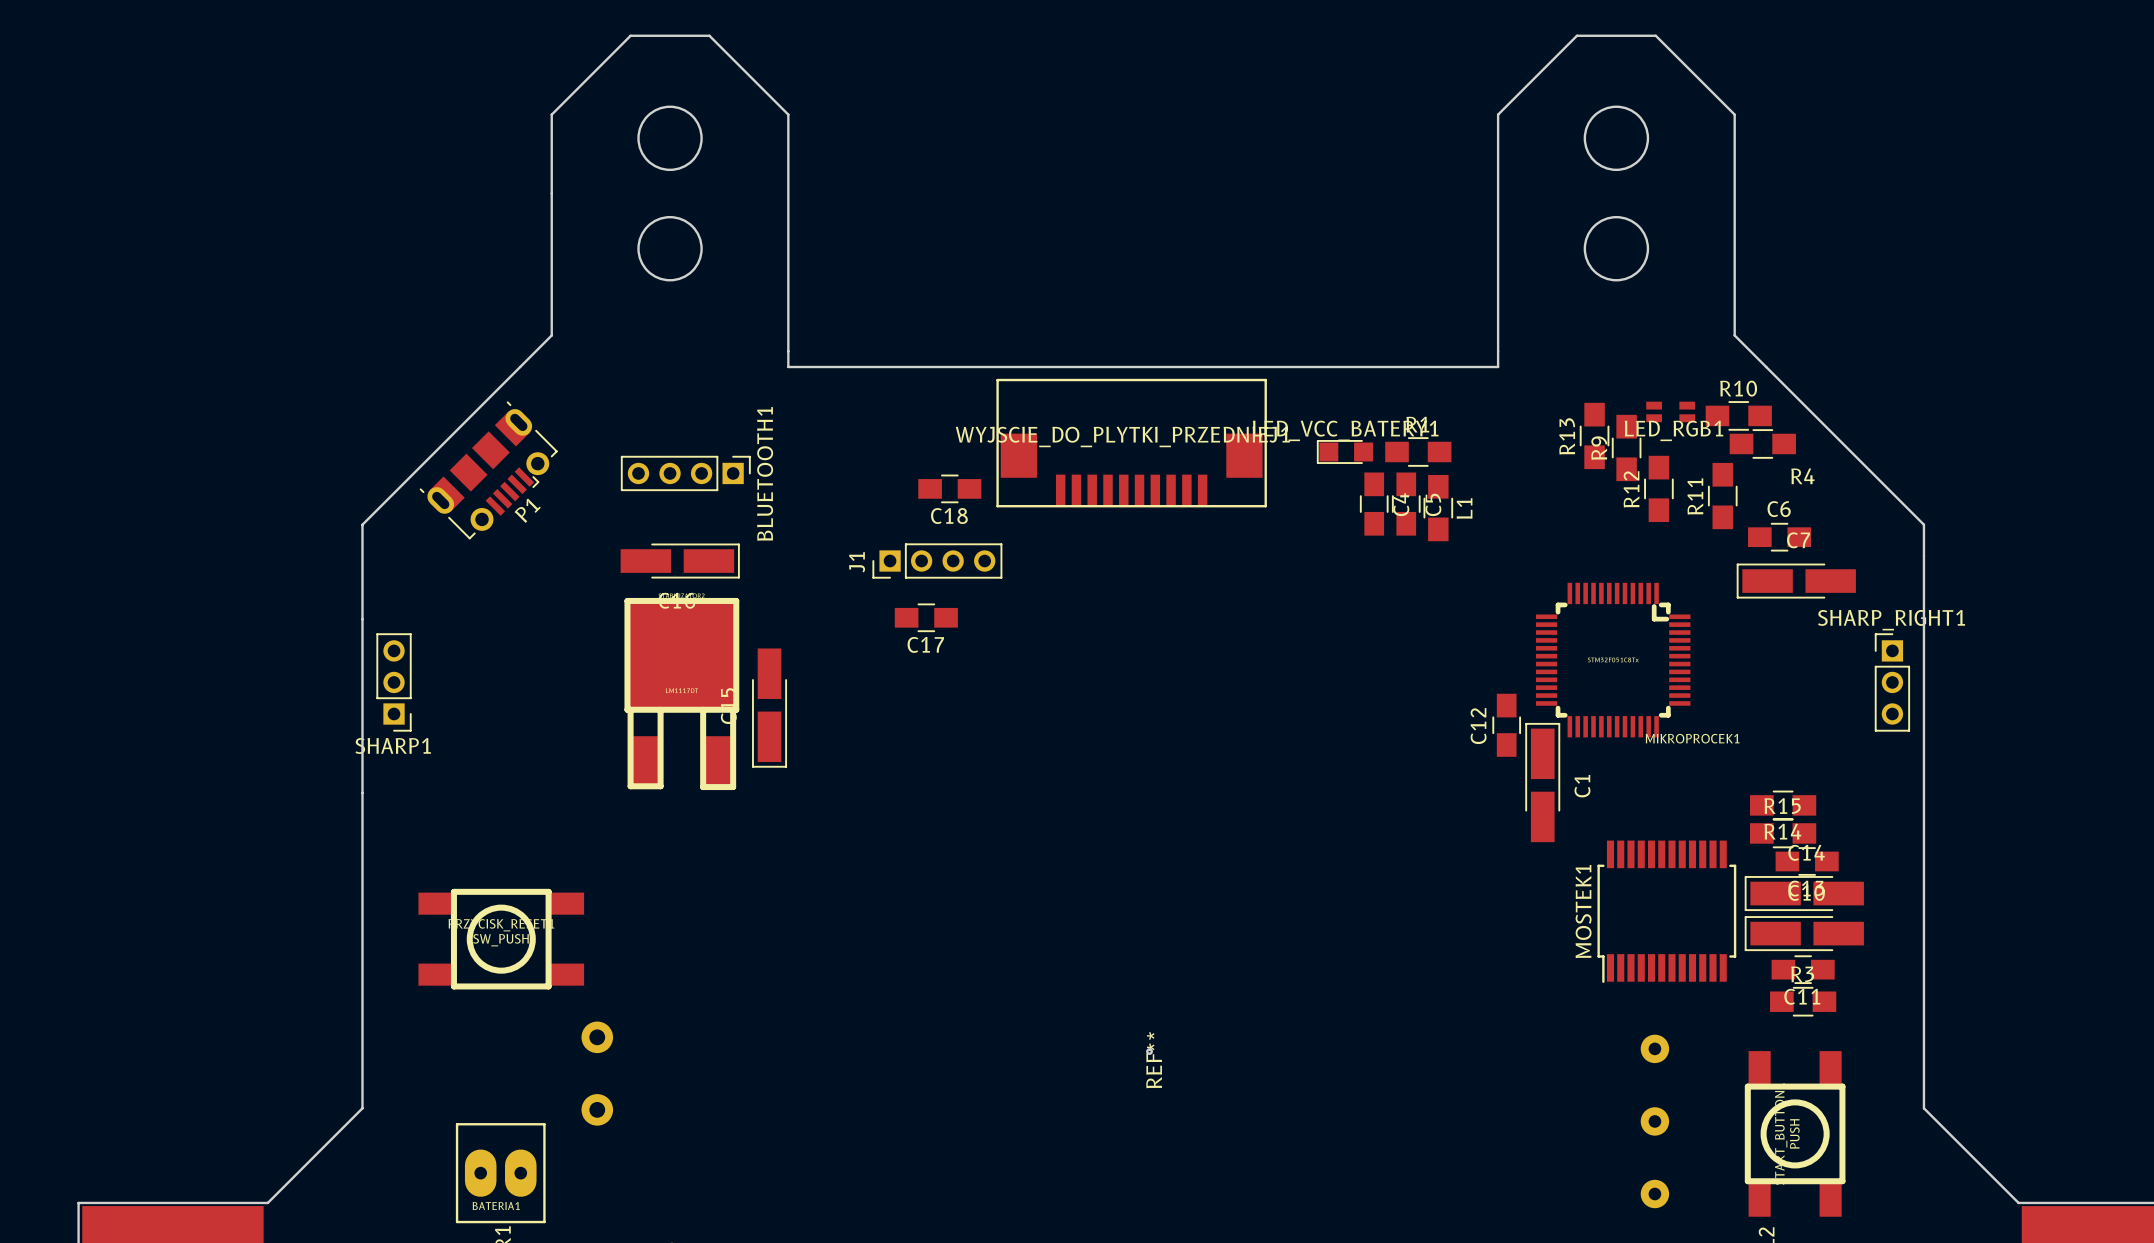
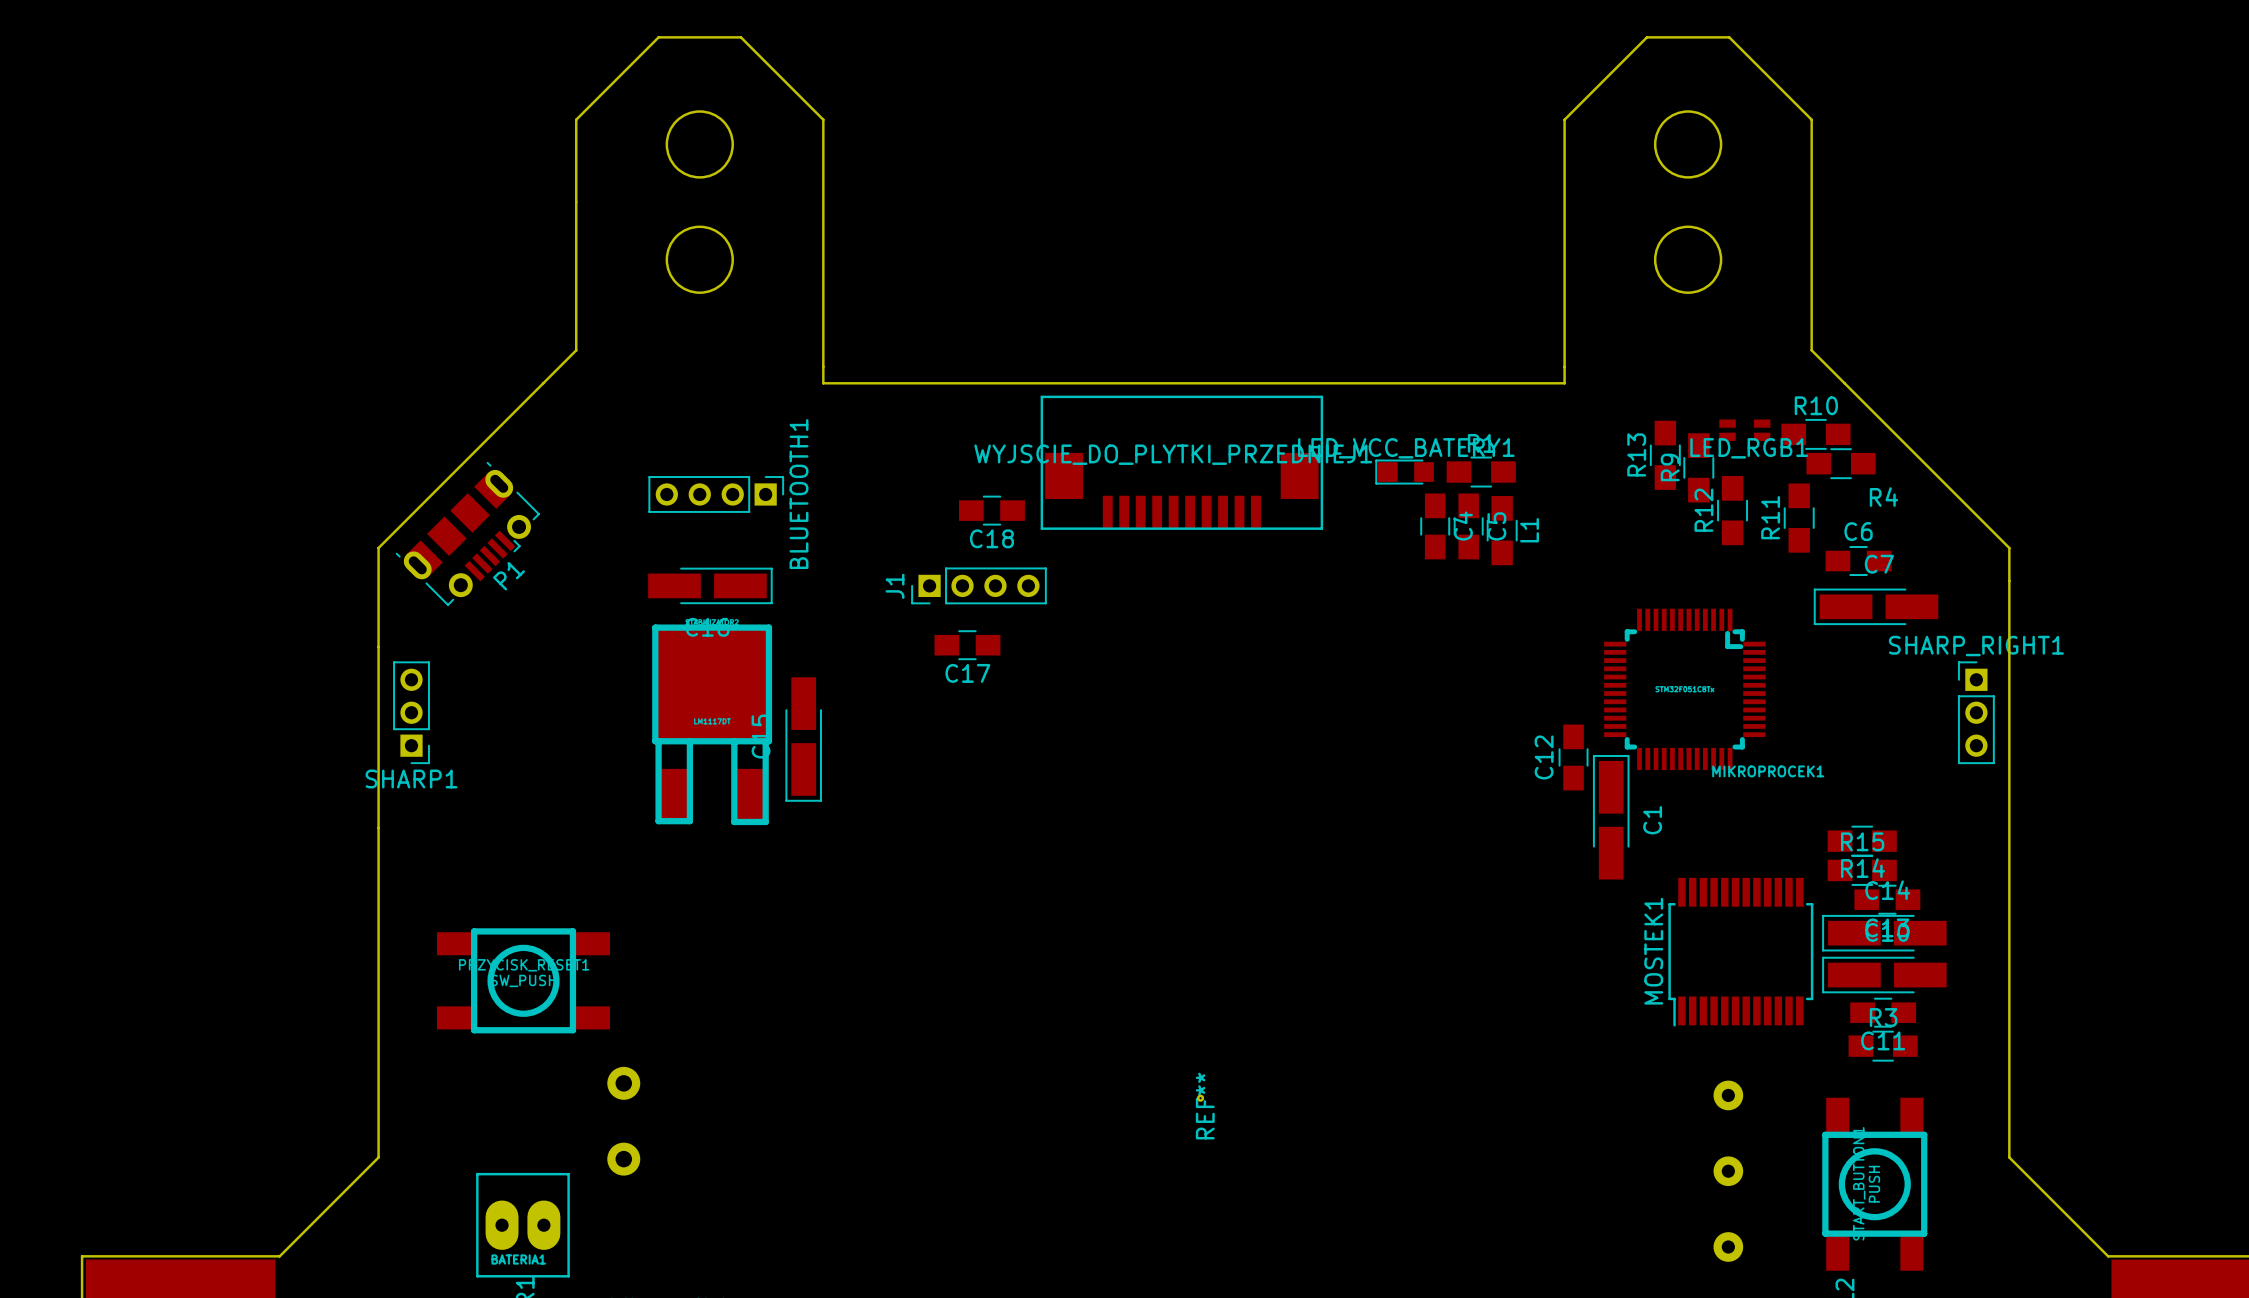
P1 position: (488, 470) -> (467, 533)

